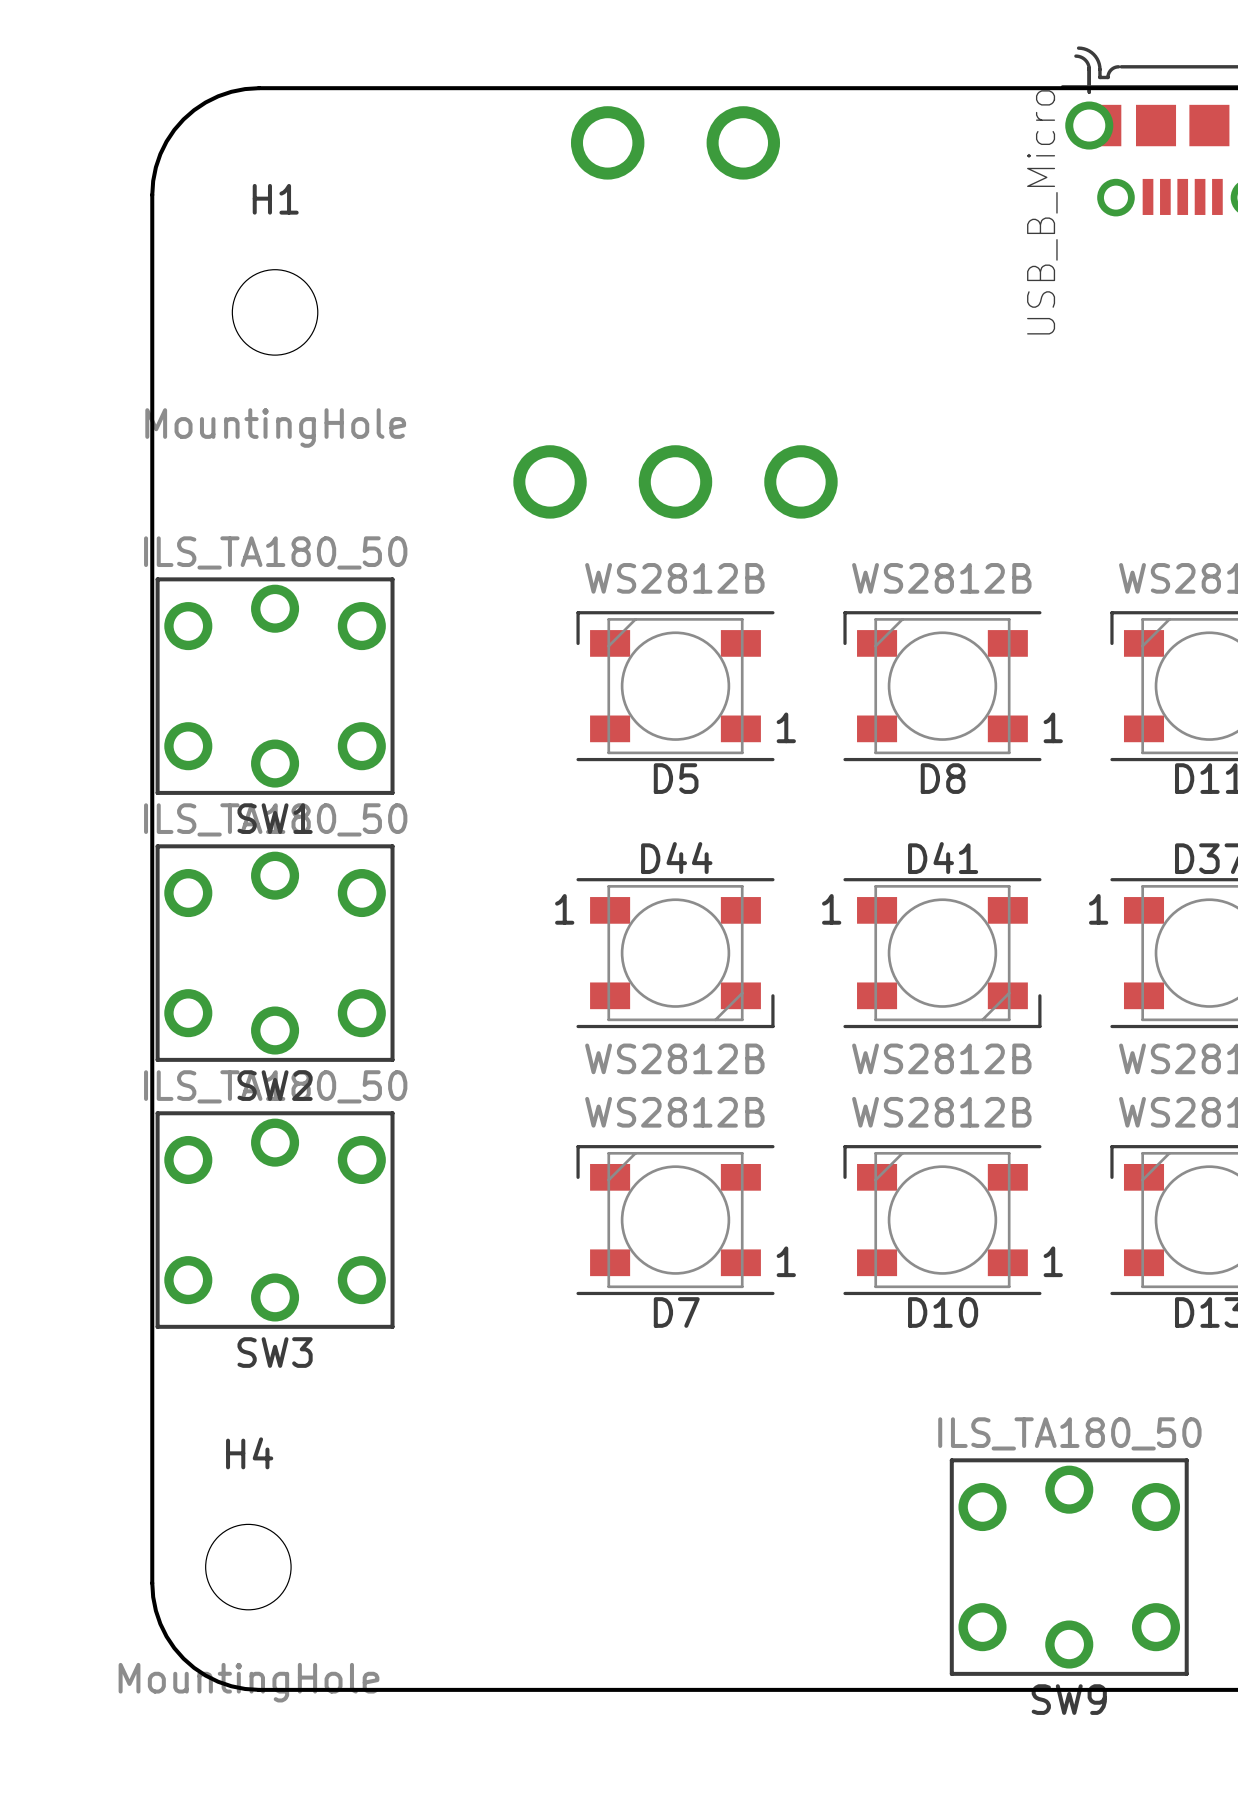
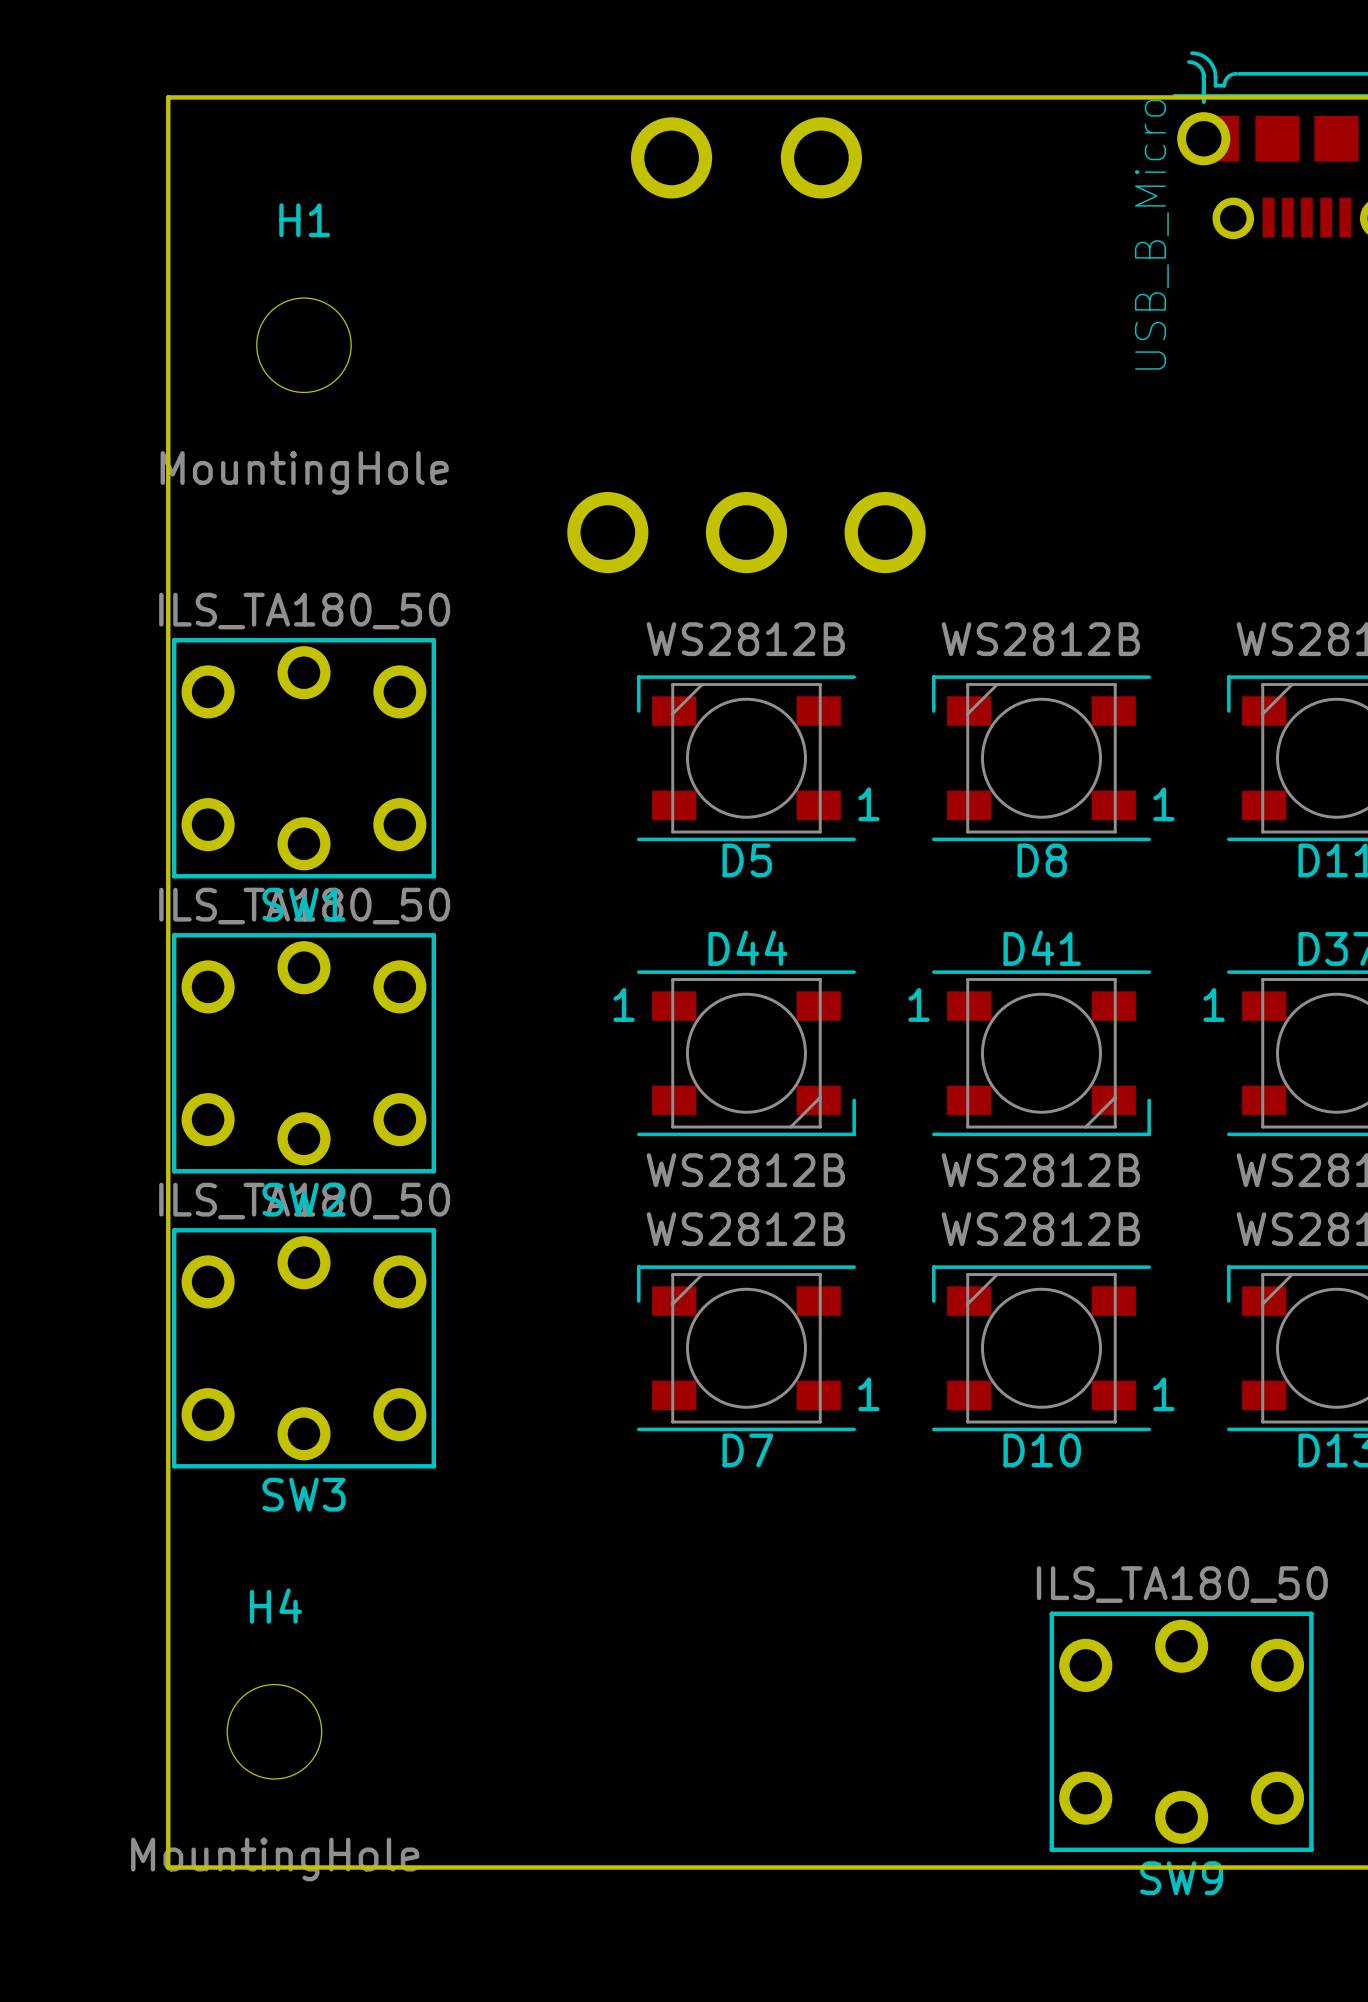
board edge: (259, 88) (231, 91) (218, 96) (194, 110) (183, 119) (166, 141) (160, 154) (155, 167) (152, 194) -> (286, 97) (168, 97) (168, 215)
board edge: (152, 1583) (155, 1610) (160, 1623) (174, 1648) (183, 1658) (205, 1675) (218, 1681) (231, 1686) (259, 1689) -> (168, 1749) (168, 1867) (286, 1867)

